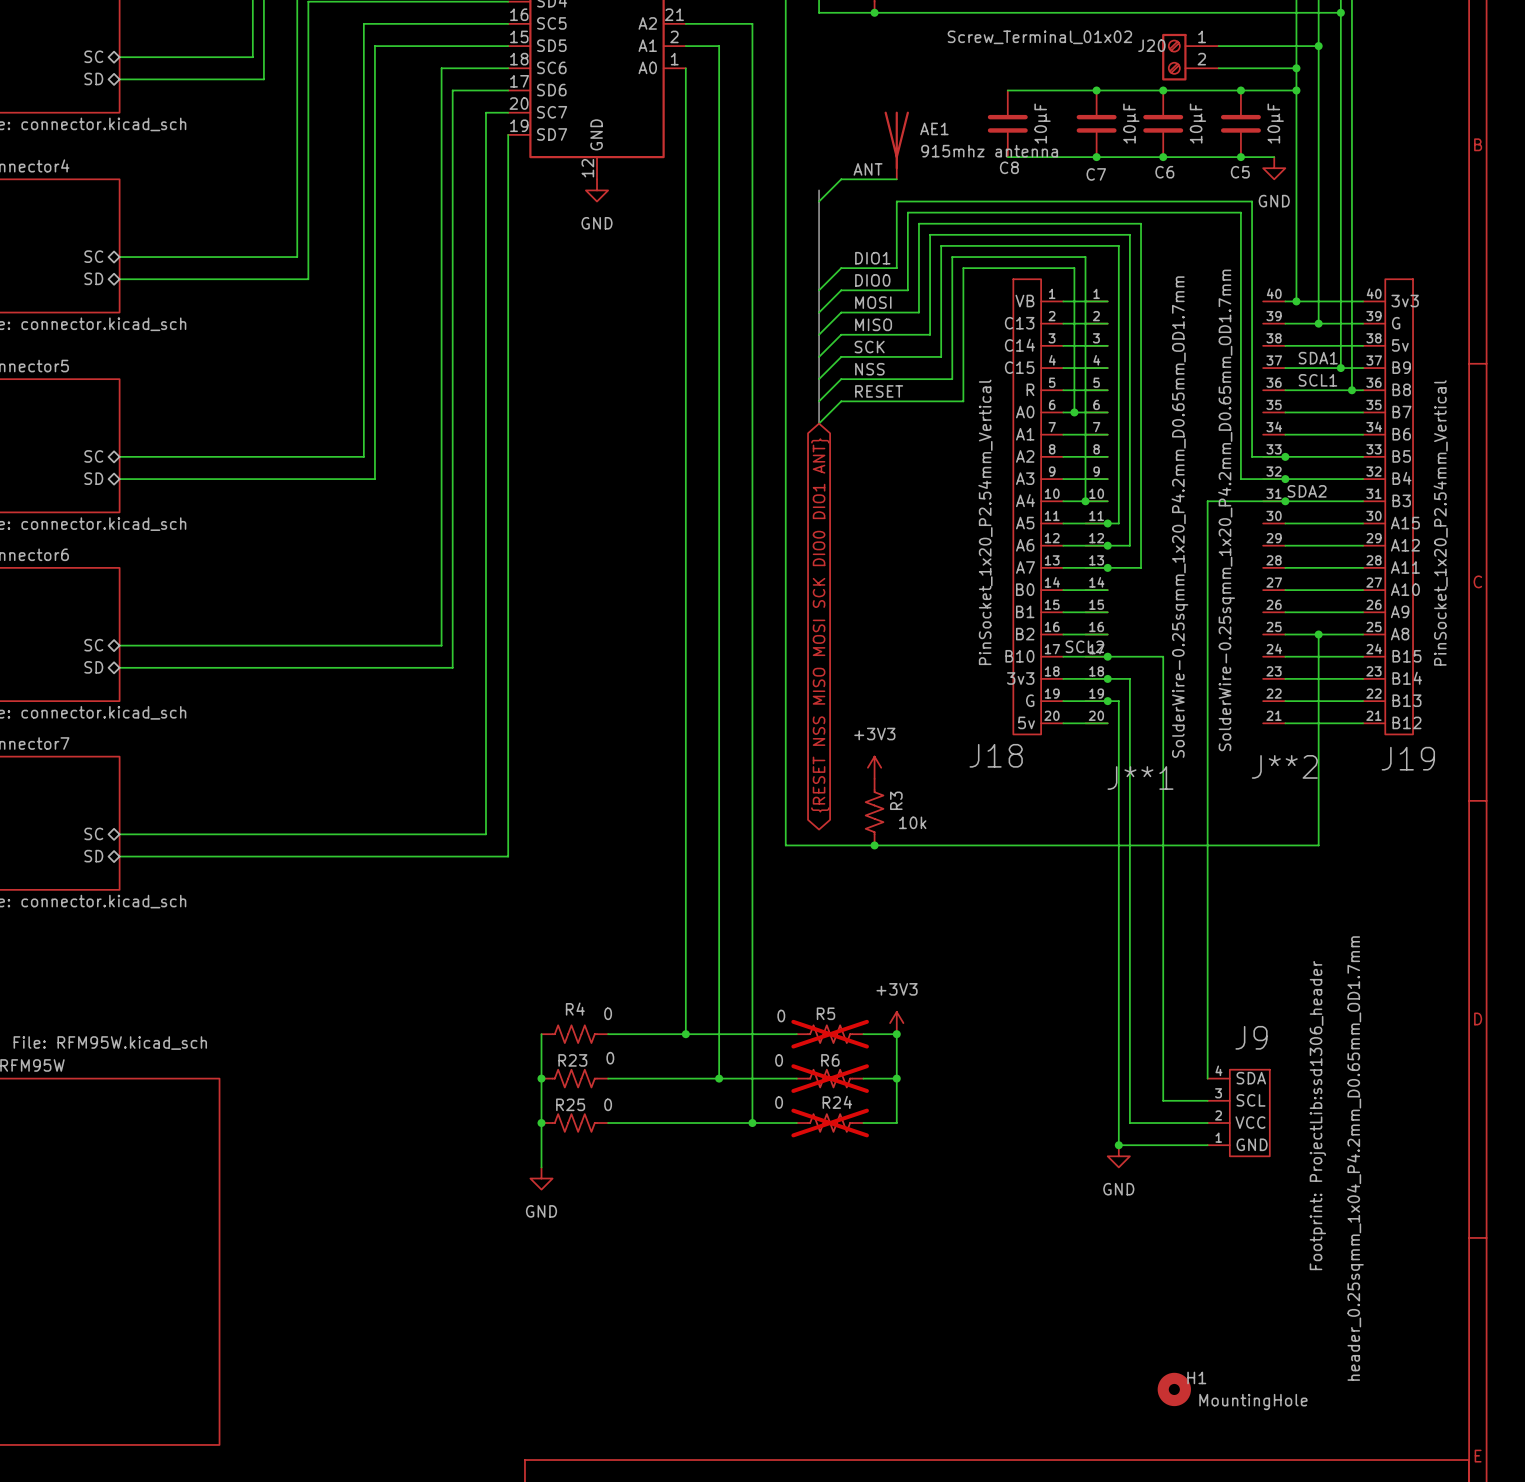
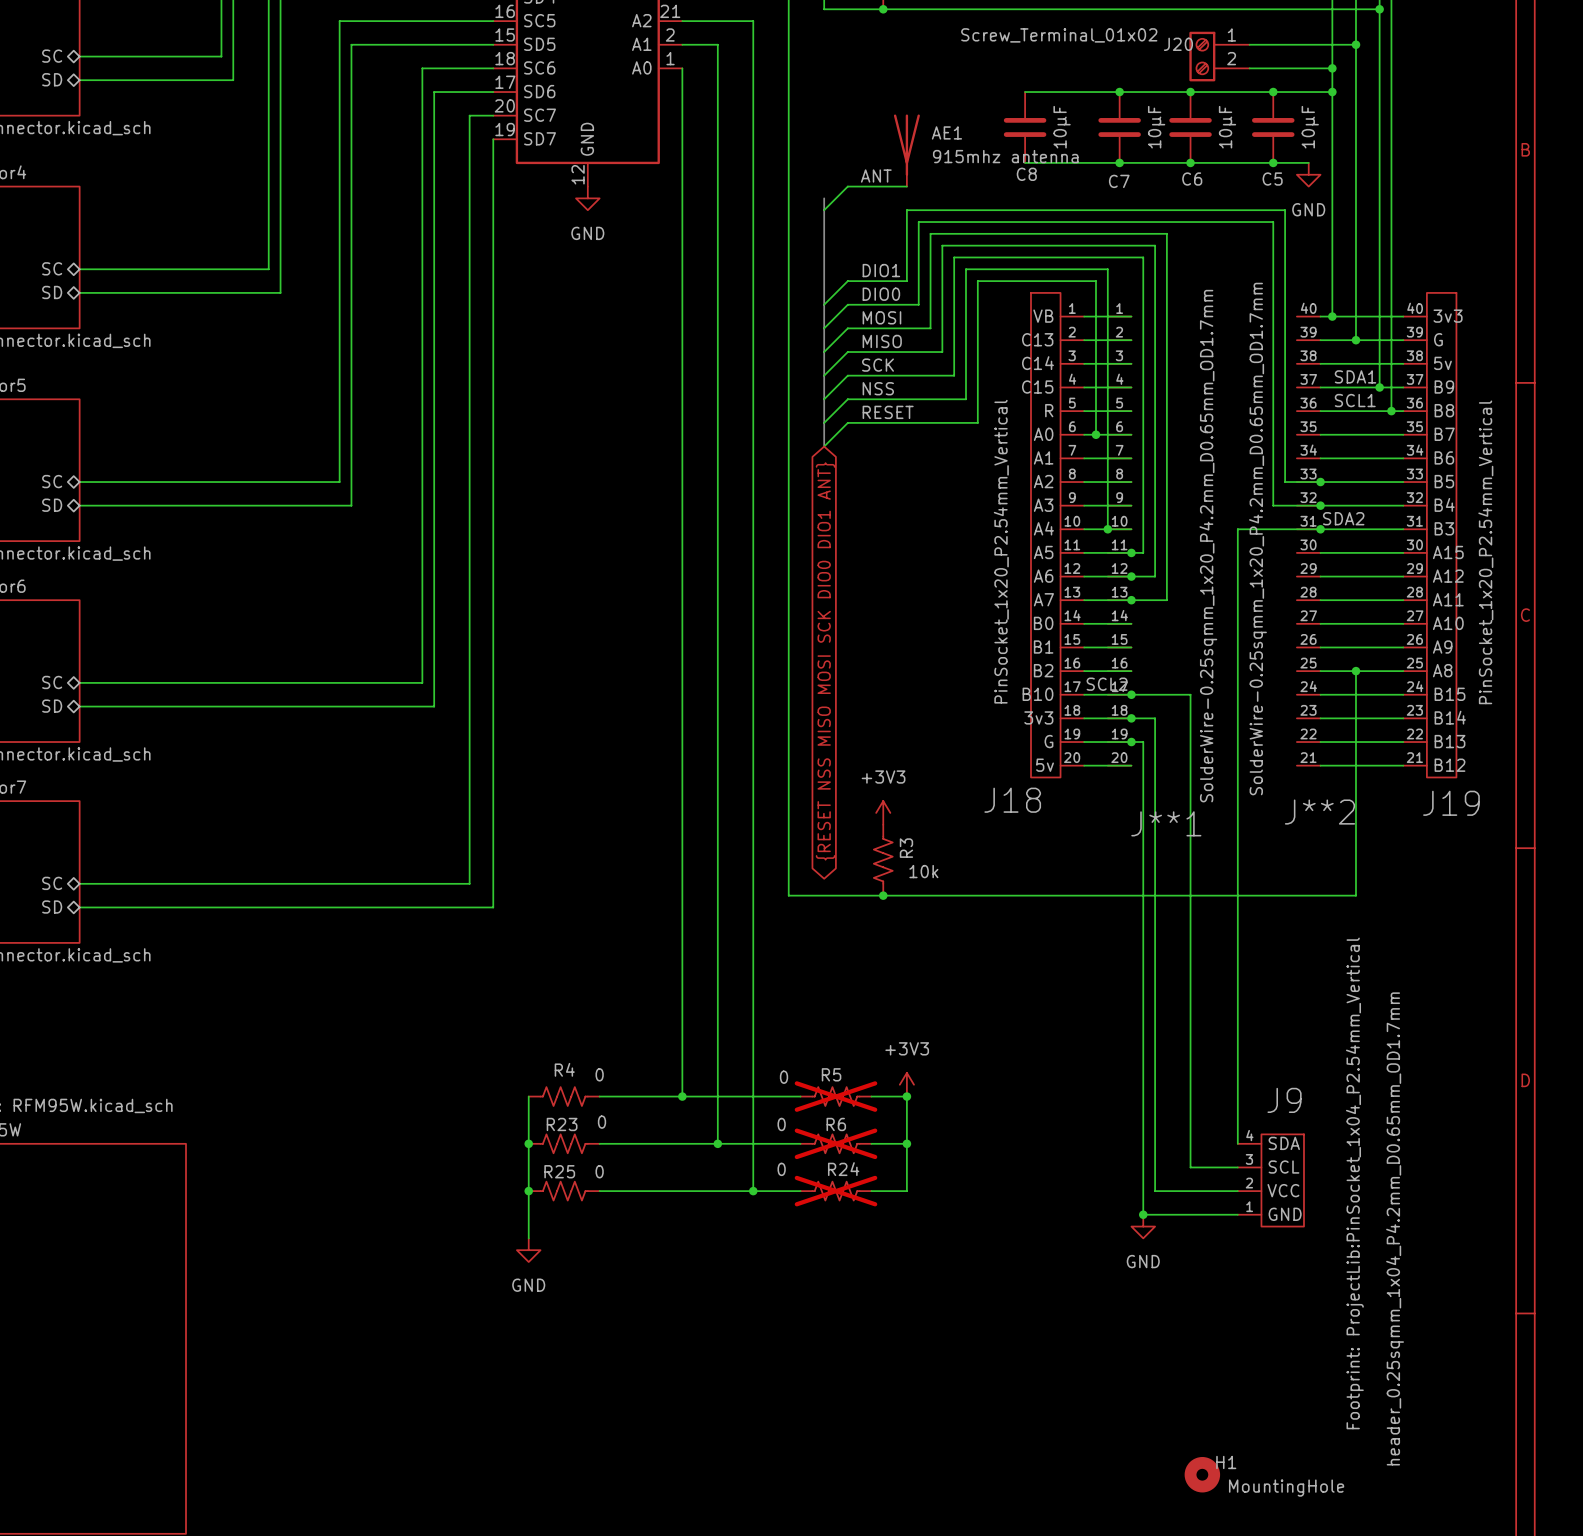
J9 text: Footprint: ProjectLib:ssd1306_header (1317, 1115) -> Footprint: ProjectLib:PinSocket_1x04_P2.54mm_Vertical (1354, 1183)

